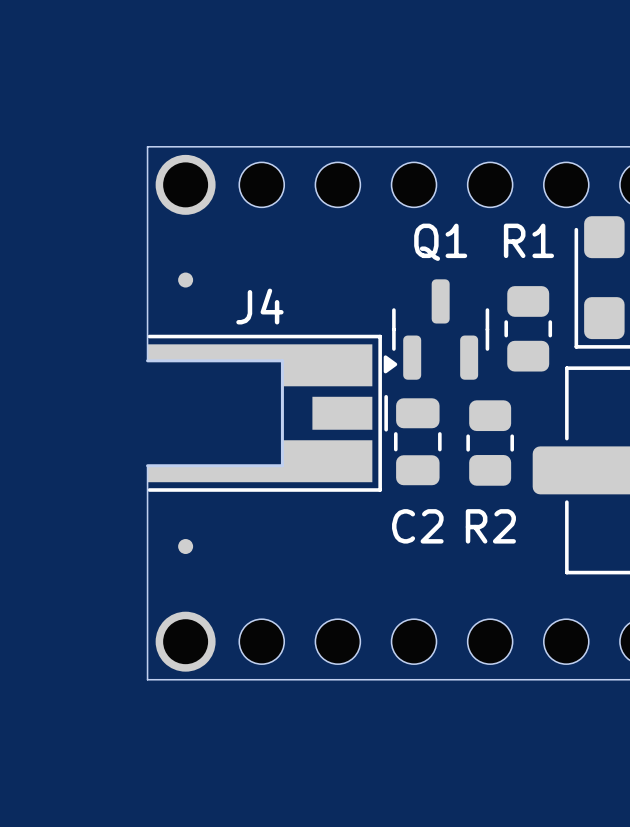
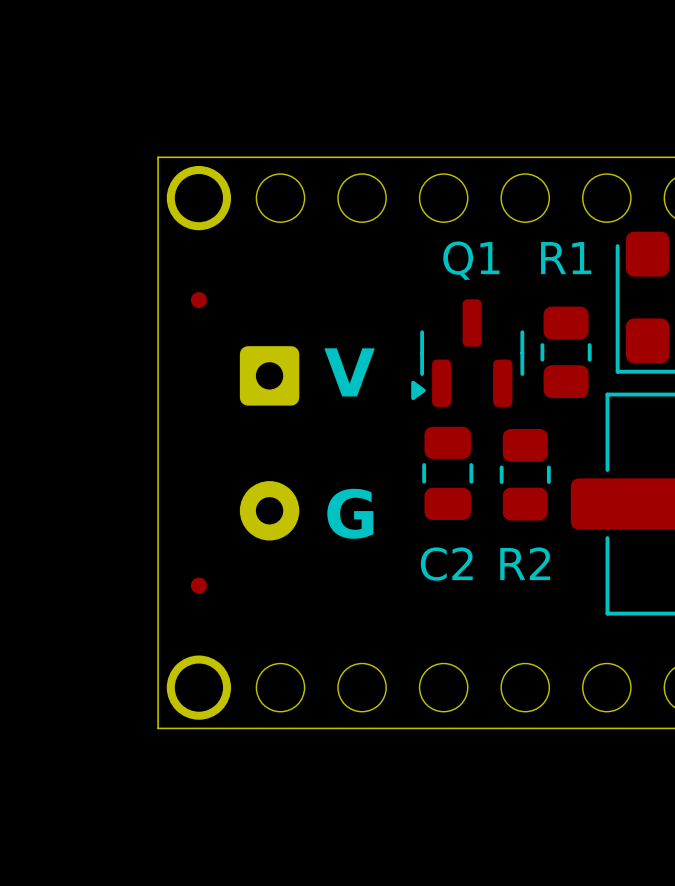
text: none -> V (349, 372)
board edge: none -> (158, 386) (158, 499)
part: none -> (269, 443)
J4: (267, 413) -> none
text: none -> G (350, 513)

